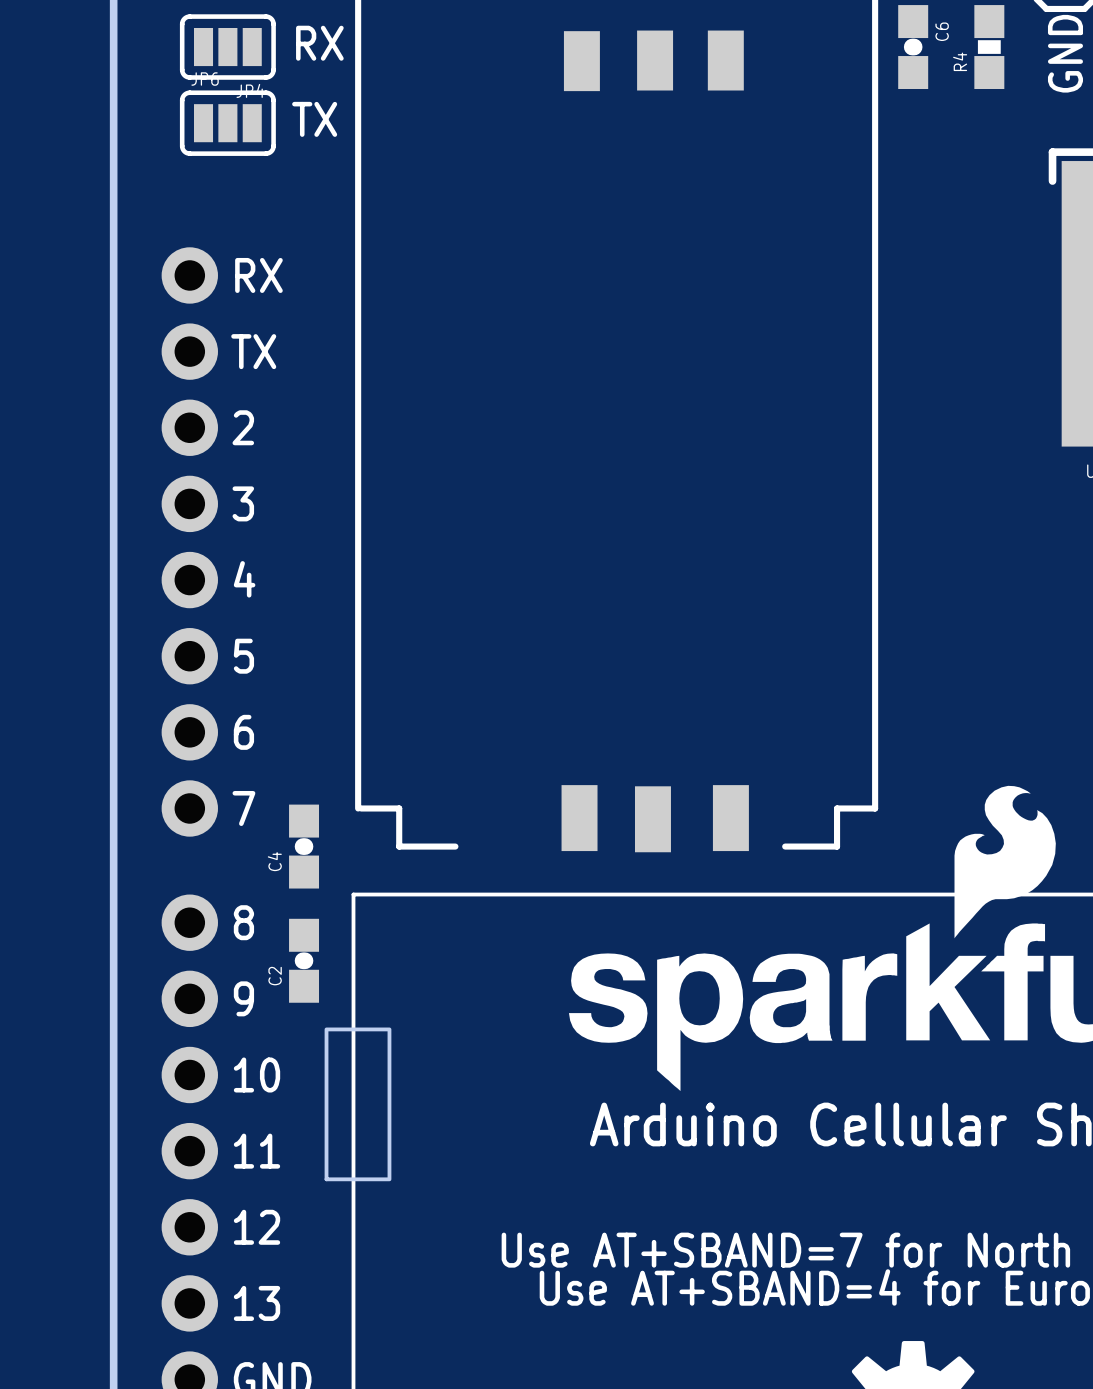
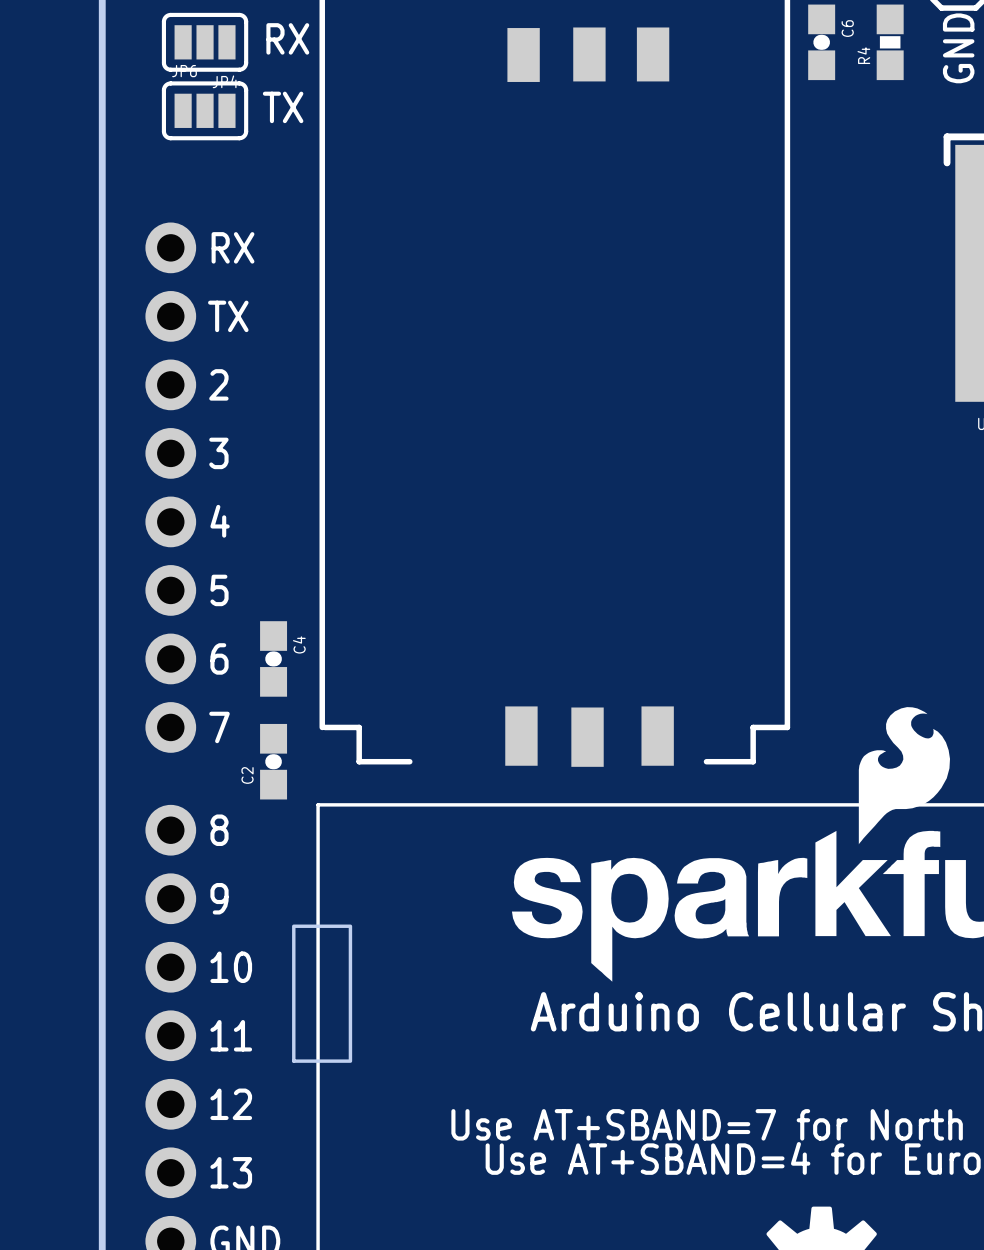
C4: none -> (273, 658)
C4 name: C4 (274, 861) -> C2 (247, 775)
C2: (304, 960) -> none

